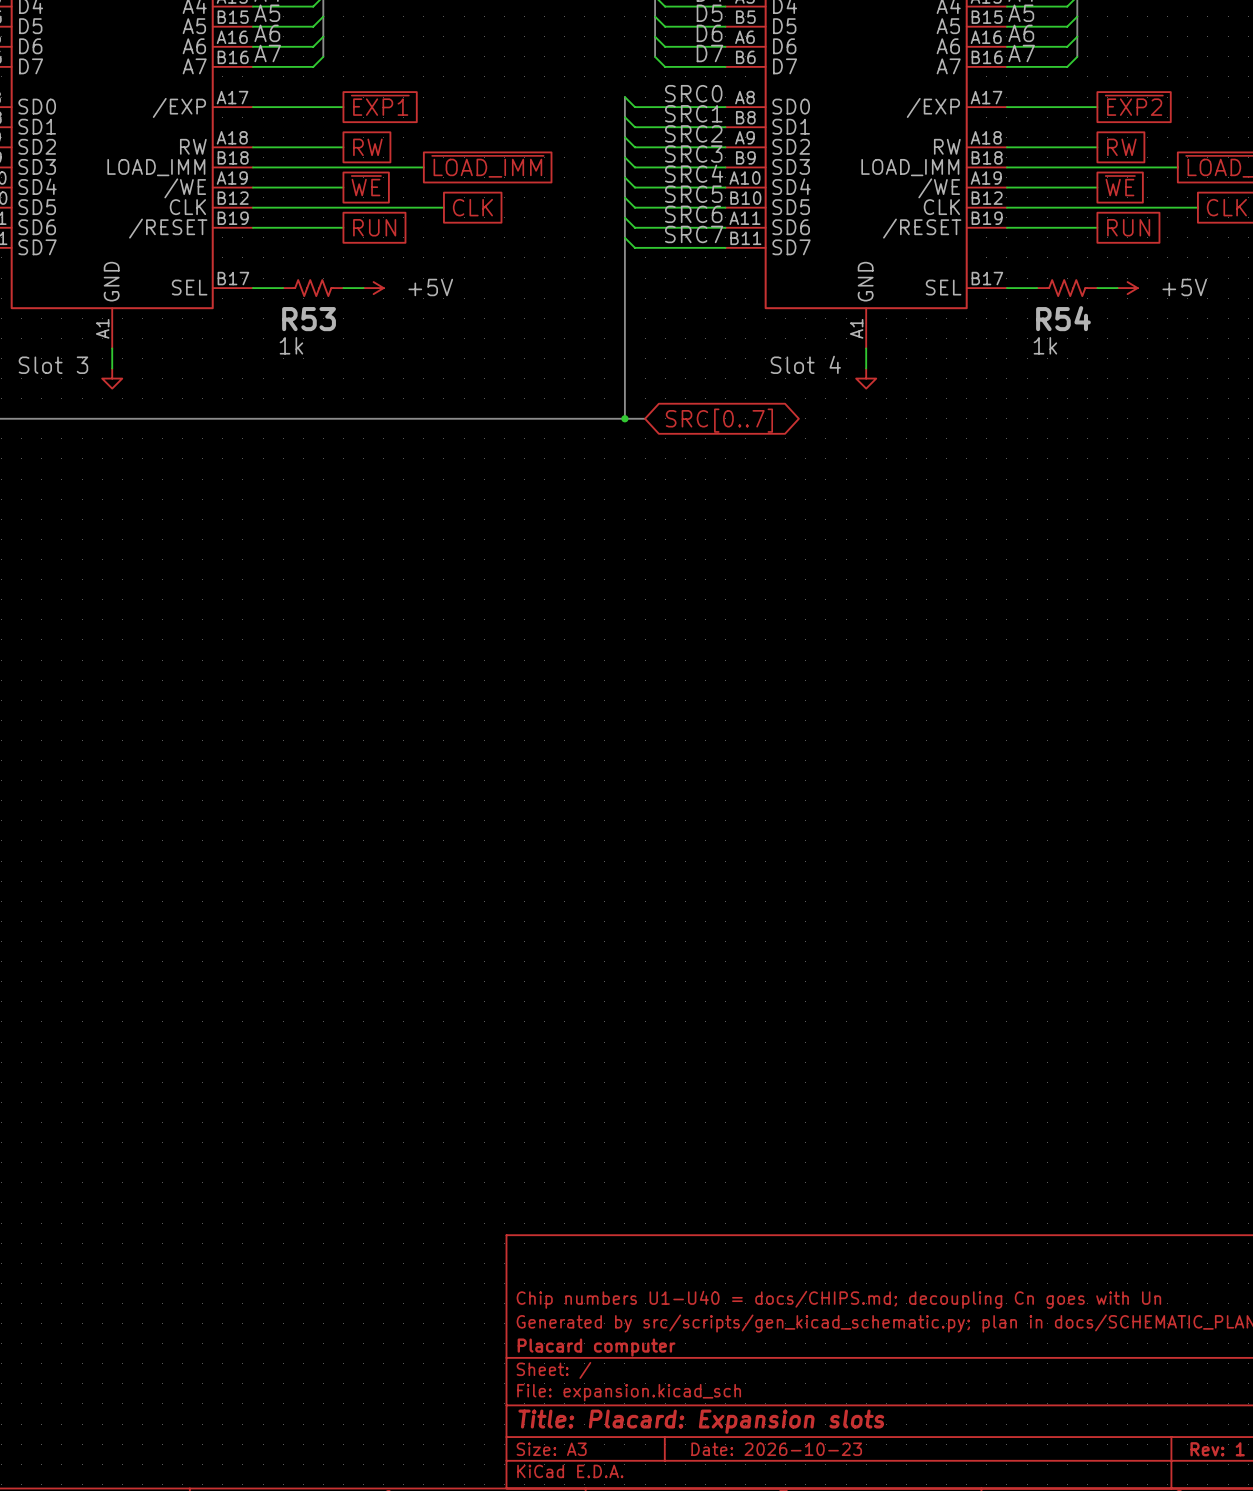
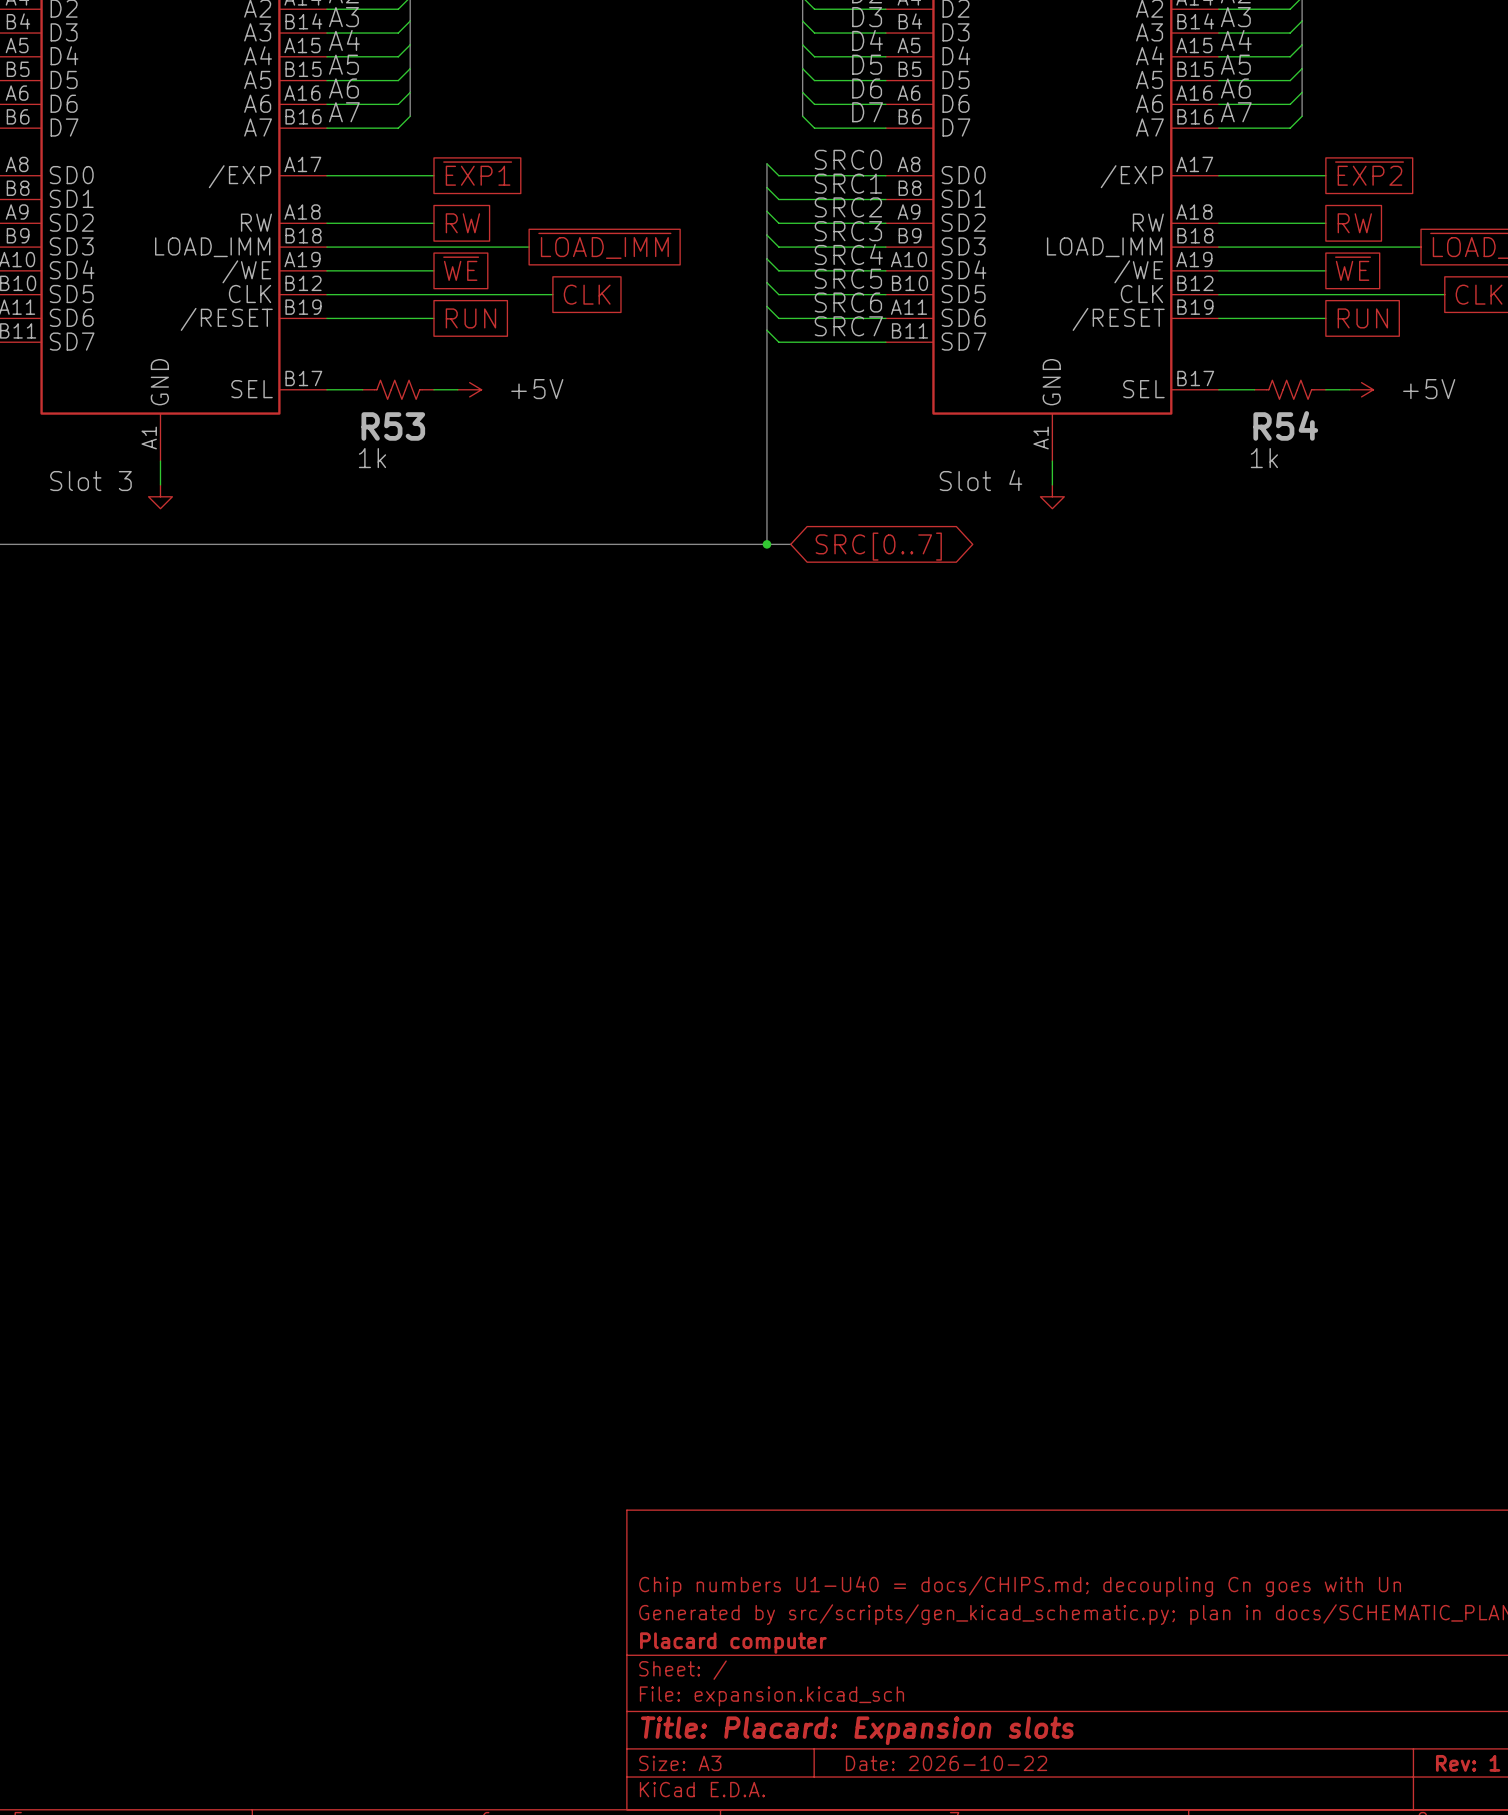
title block: Date: 2026-10-23 (776, 1449) -> Date: 2026-10-22 (946, 1763)

